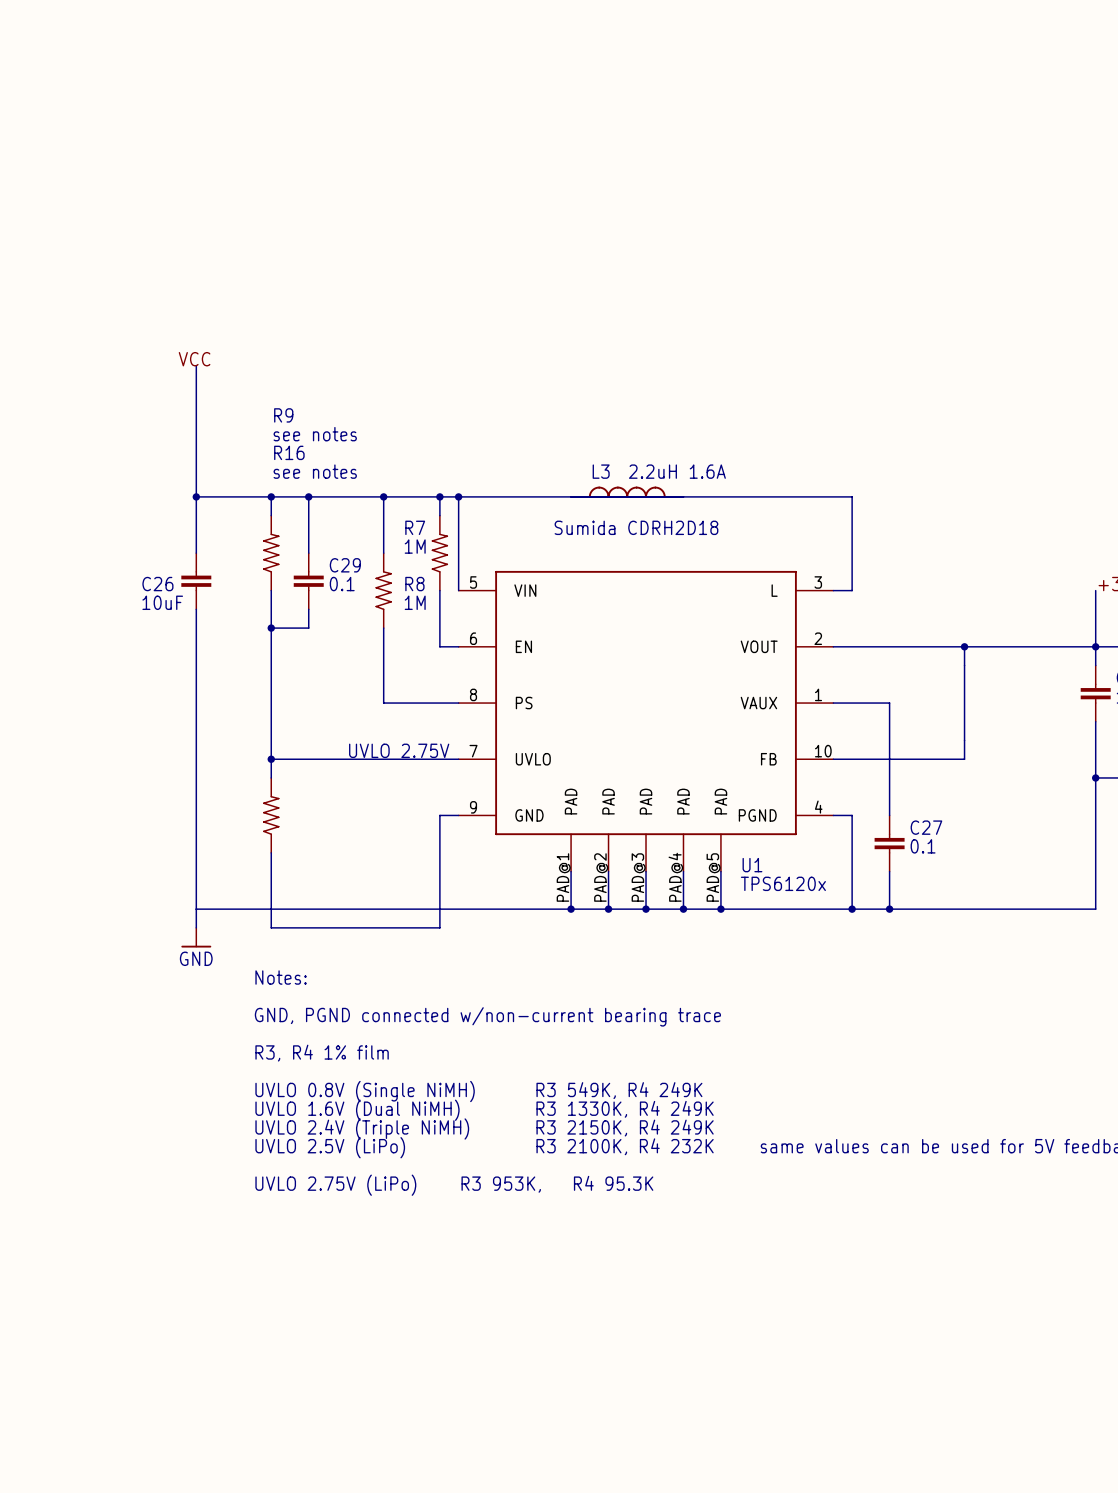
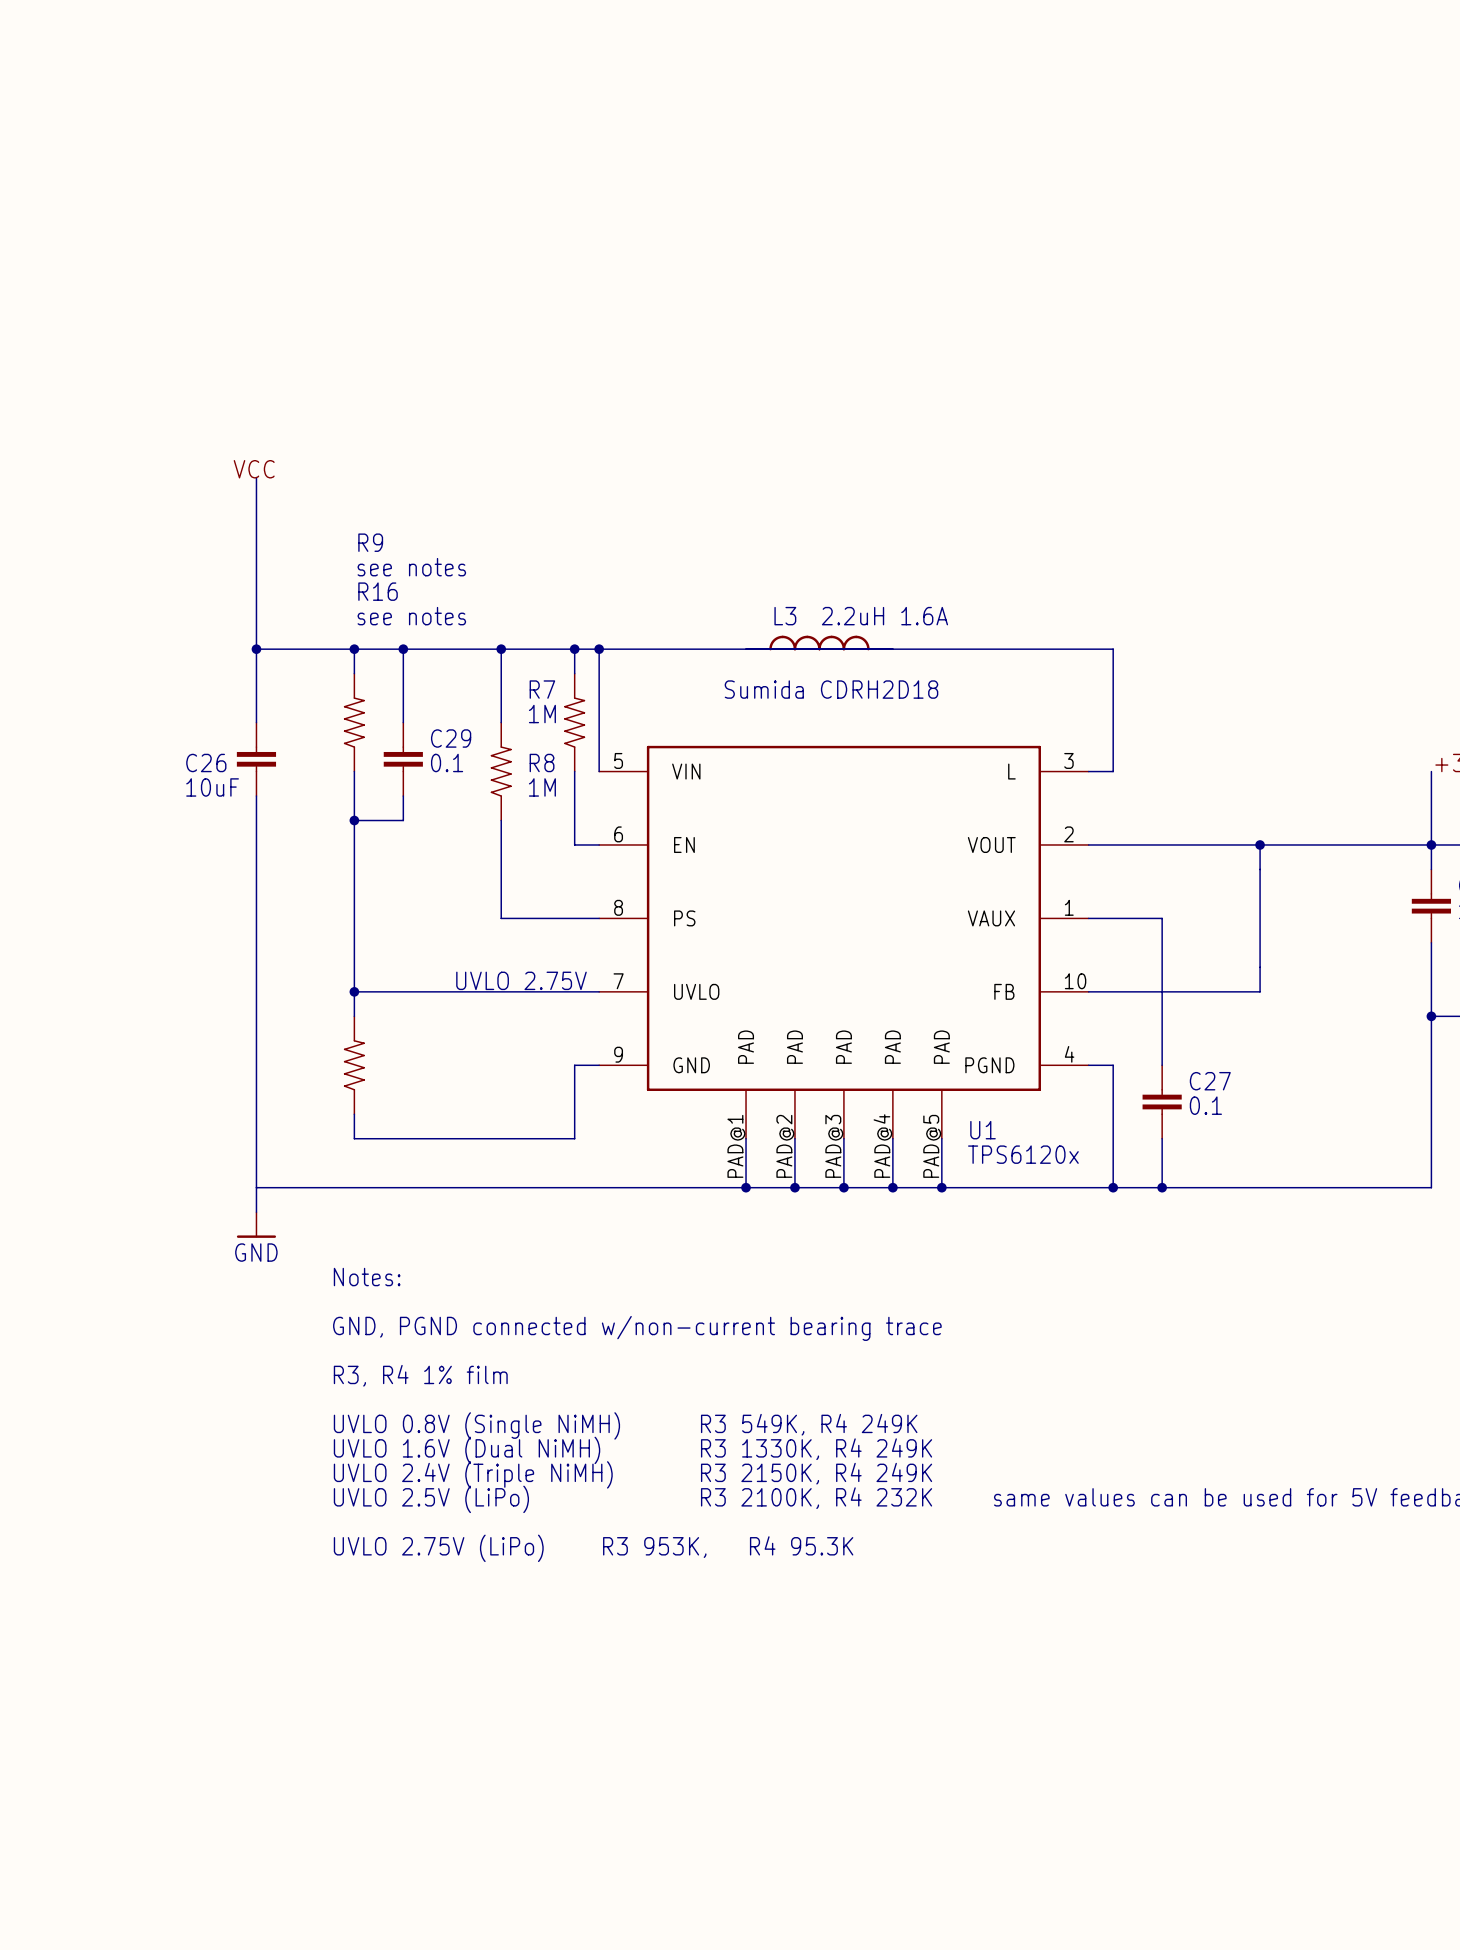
wire: (271, 871) (271, 927) (439, 927) (439, 871) -> (354, 1138) (574, 1138)

